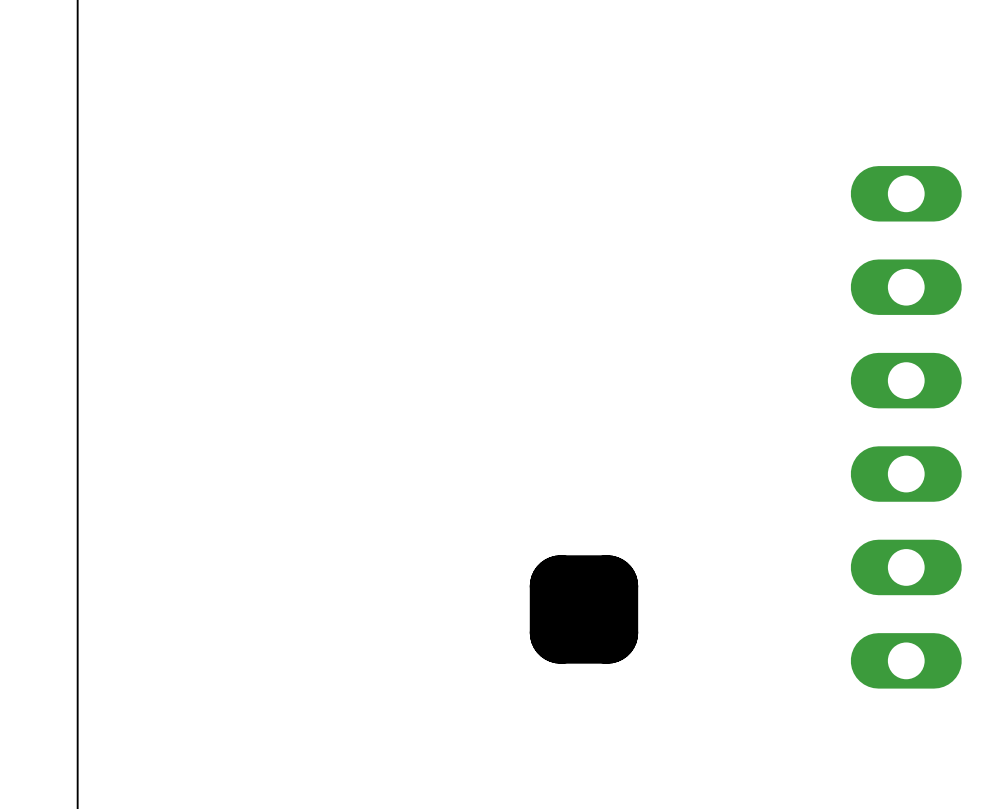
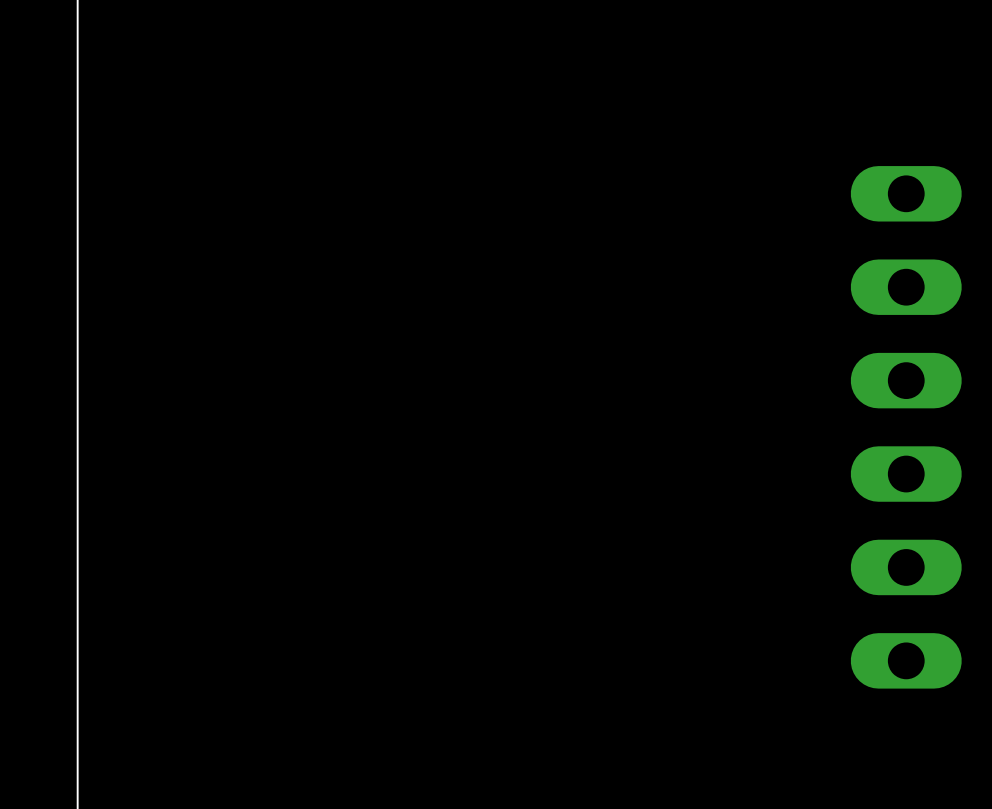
board edge: (607, 586) (560, 586) (560, 632) (607, 632) (607, 586) -> none

